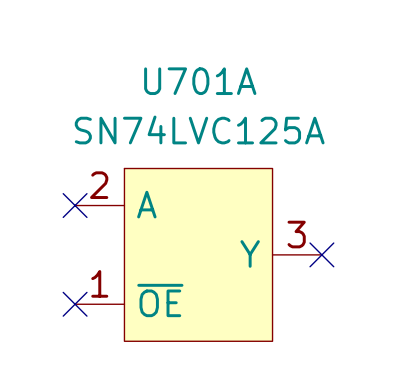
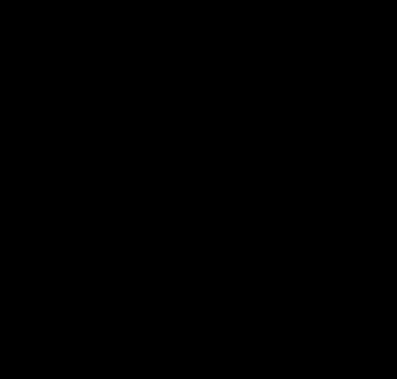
no-connect mark: (75, 205) -> none
U701A: SN74LVC125A (198, 254) -> none
no-connect mark: (321, 254) -> none
no-connect mark: (75, 304) -> none

